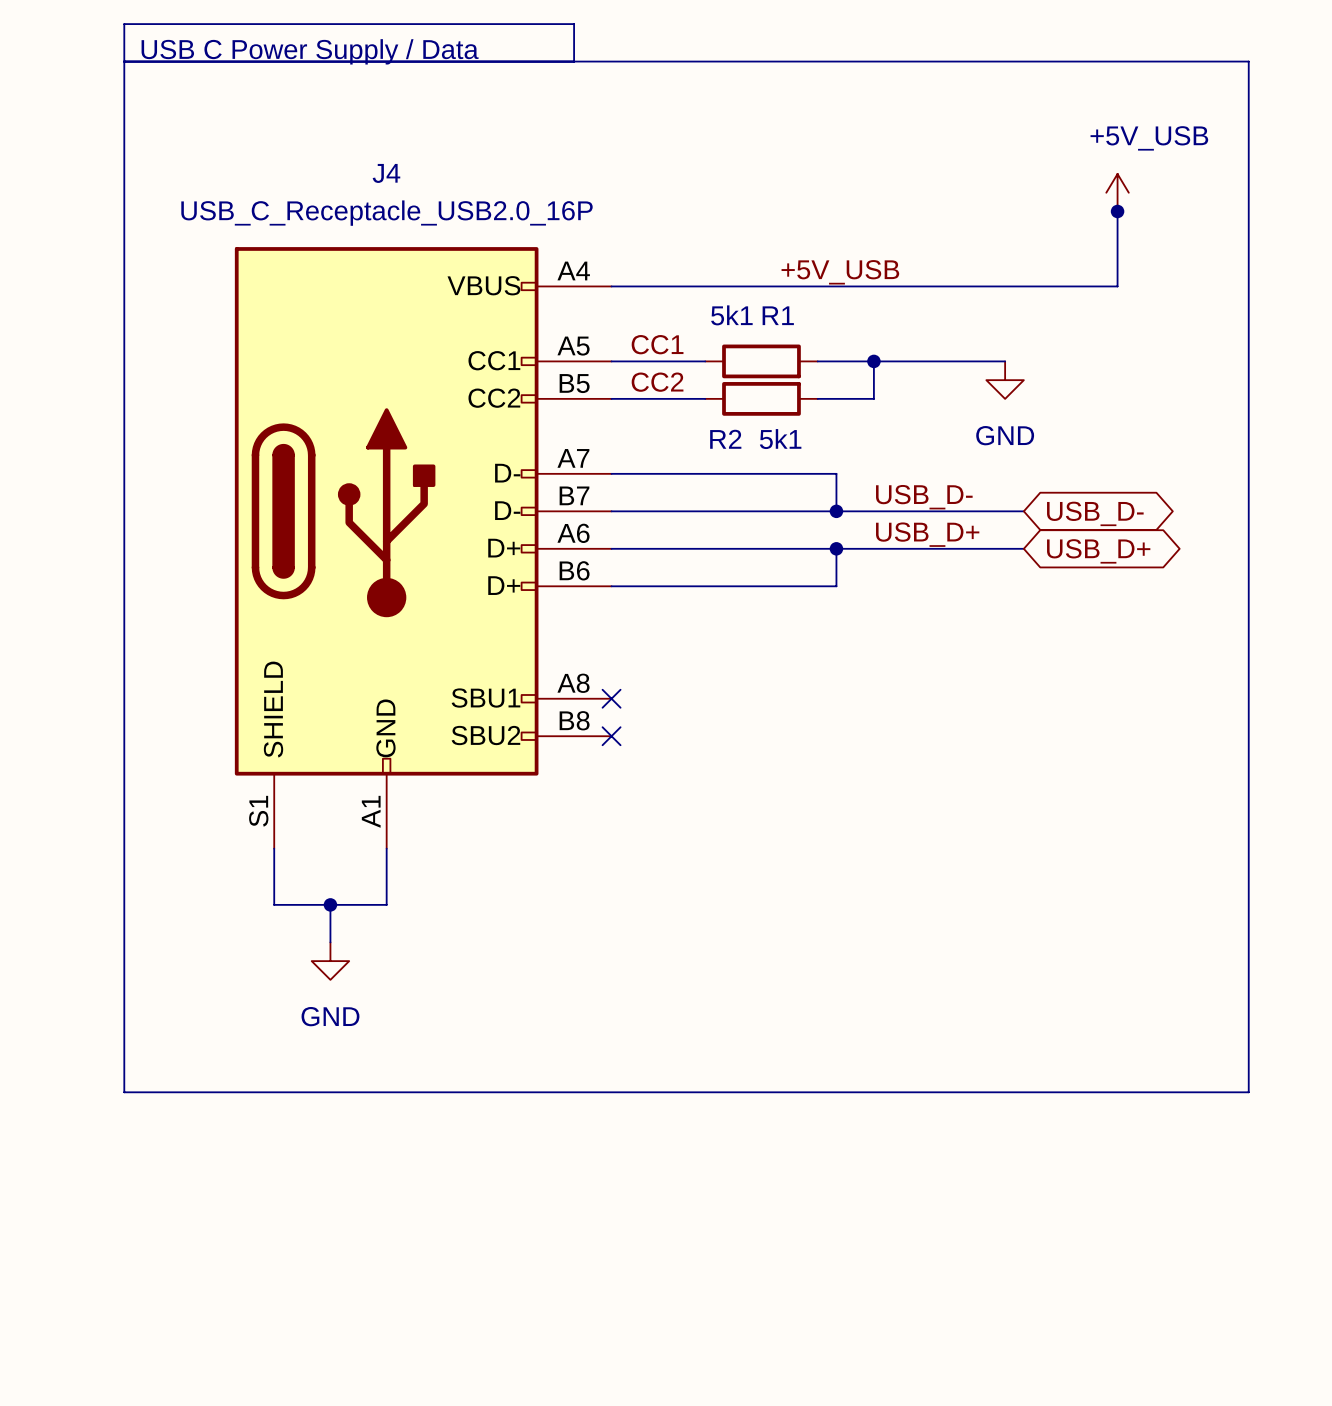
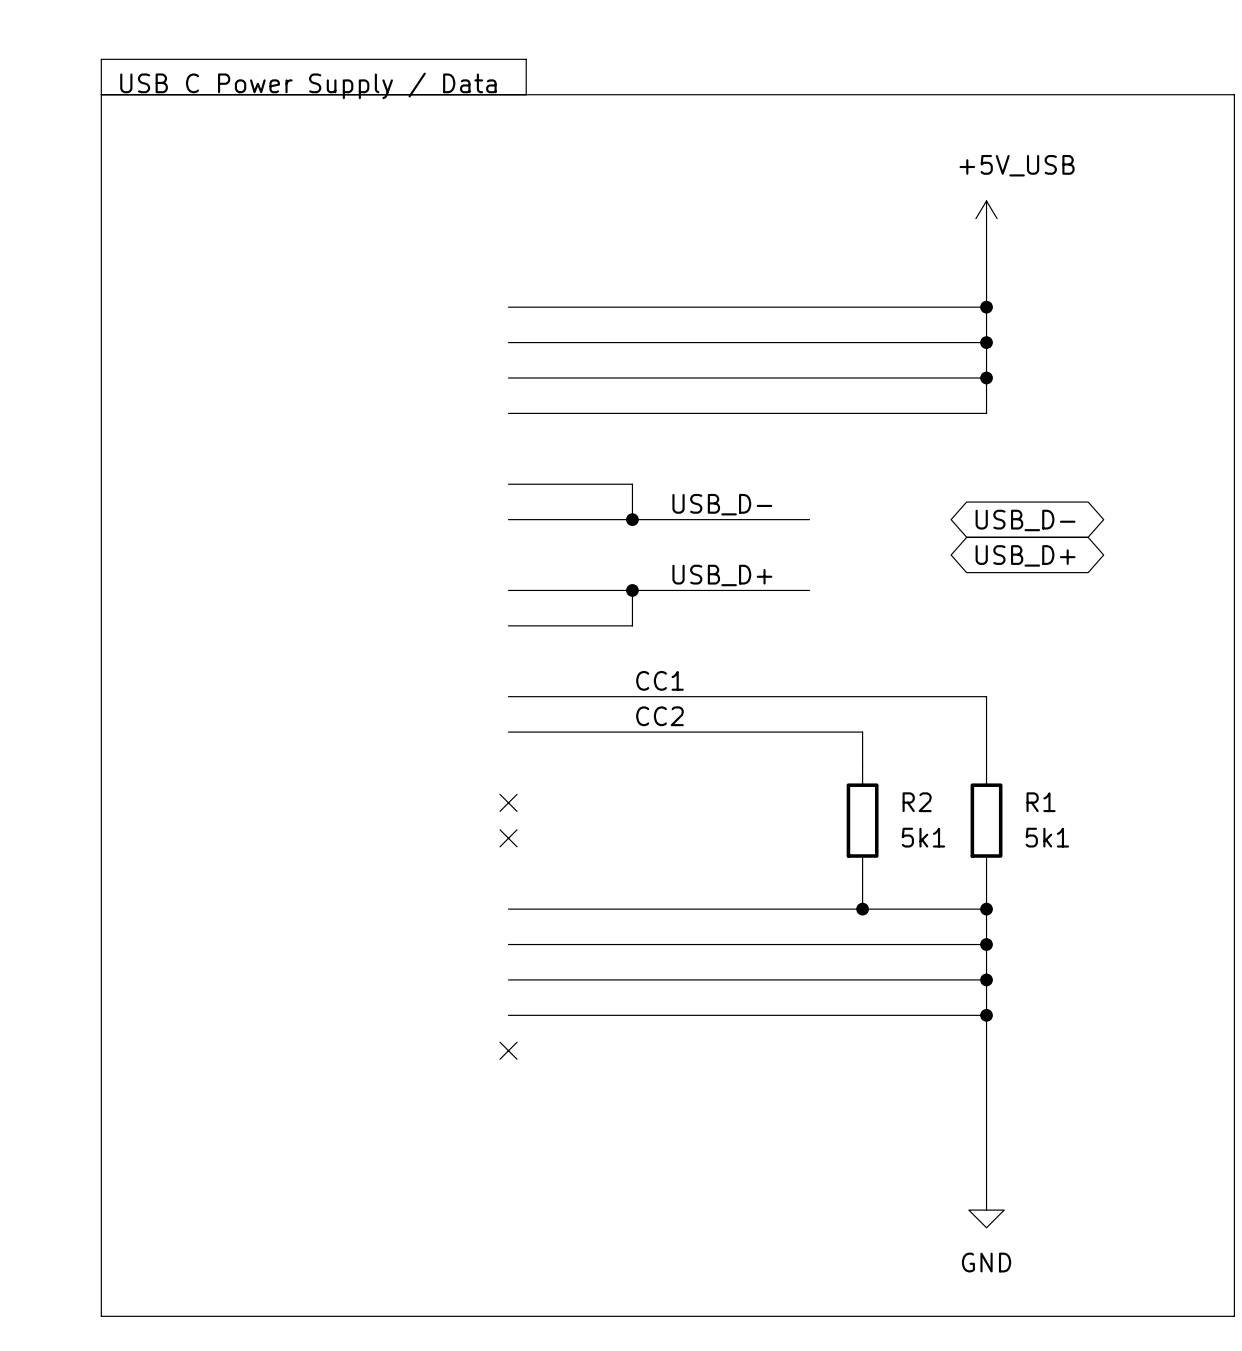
line: (1248, 61) (1248, 1092) (124, 1092) -> (1163, 94) (1234, 94) (1234, 1316) (101, 1316) (101, 1068)
power symbol position: +5V_USB (1149, 192) -> +5V_USB (1016, 218)
wire: (1117, 211) (1117, 286) (1061, 286) -> none
junction: (1117, 211) -> none
label: +5V_USB (840, 272) -> none
junction: none -> (986, 307)
R1 value position: 5k1 (731, 315) -> 5k1 (1047, 837)
R1 name position: R1 (778, 315) -> R1 (1041, 802)
wire: none -> (508, 342) (986, 342)
junction: none -> (986, 342)
label position: CC1 (657, 344) -> CC1 (659, 680)
wire: none -> (650, 377) (756, 377)
R1 rotation: 0° (761, 361) -> 90° clockwise (986, 820)
R1 position: (761, 361) -> (986, 820)
wire: (873, 361) (873, 398) -> (986, 236) (986, 413) (809, 413)
junction: (873, 361) -> none
wire: none -> (933, 377) (986, 377)
junction: none -> (986, 377)
power symbol: GND (1005, 380) -> none
label position: CC2 (657, 382) -> CC2 (659, 716)
wire: none -> (650, 413) (756, 413)
R2 rotation: 0° (761, 398) -> 90° clockwise (862, 820)
R2 position: (761, 398) -> (862, 820)
R2 name position: R2 (725, 439) -> R2 (917, 802)
R2 value position: 5k1 (780, 439) -> 5k1 (923, 837)
wire: (686, 473) (836, 473) (836, 511) -> (632, 484) (632, 519)
label position: USB_D- (924, 497) -> USB_D- (722, 504)
junction: none -> (632, 519)
junction: (836, 511) -> none
wire: (873, 511) (1023, 511) -> none
label position: USB_D+ (927, 534) -> USB_D+ (722, 575)
J4: USB_C_Receptacle_USB2.0_16P (423, 547) -> none
wire: (611, 548) (1023, 548) -> none
wire: (836, 548) (836, 586) -> (809, 590) (774, 590)
junction: (836, 548) -> none
wire: none -> (632, 590) (632, 625) (508, 625)
junction: none -> (632, 590)
wire: none -> (508, 696) (986, 696) (986, 767)
no-connect mark: (611, 698) -> none
wire: none -> (508, 732) (862, 732) (862, 767)
no-connect mark: (611, 736) -> none
no-connect mark: none -> (508, 802)
wire: (274, 848) (274, 904) (386, 904) (386, 848) -> none
no-connect mark: none -> (508, 838)
wire: none -> (862, 873) (862, 909)
wire: none -> (986, 873) (986, 1192)
wire: (330, 904) (330, 942) -> none
junction: (330, 904) -> none
wire: none -> (508, 909) (986, 909)
junction: none -> (862, 909)
junction: none -> (986, 909)
power symbol: GND (330, 961) -> none
wire: none -> (508, 944) (986, 944)
junction: none -> (986, 944)
wire: none -> (508, 979) (986, 979)
junction: none -> (986, 979)
wire: none -> (508, 1015) (986, 1015)
junction: none -> (986, 1015)
no-connect mark: none -> (508, 1050)
power symbol: none -> GND (986, 1210)

